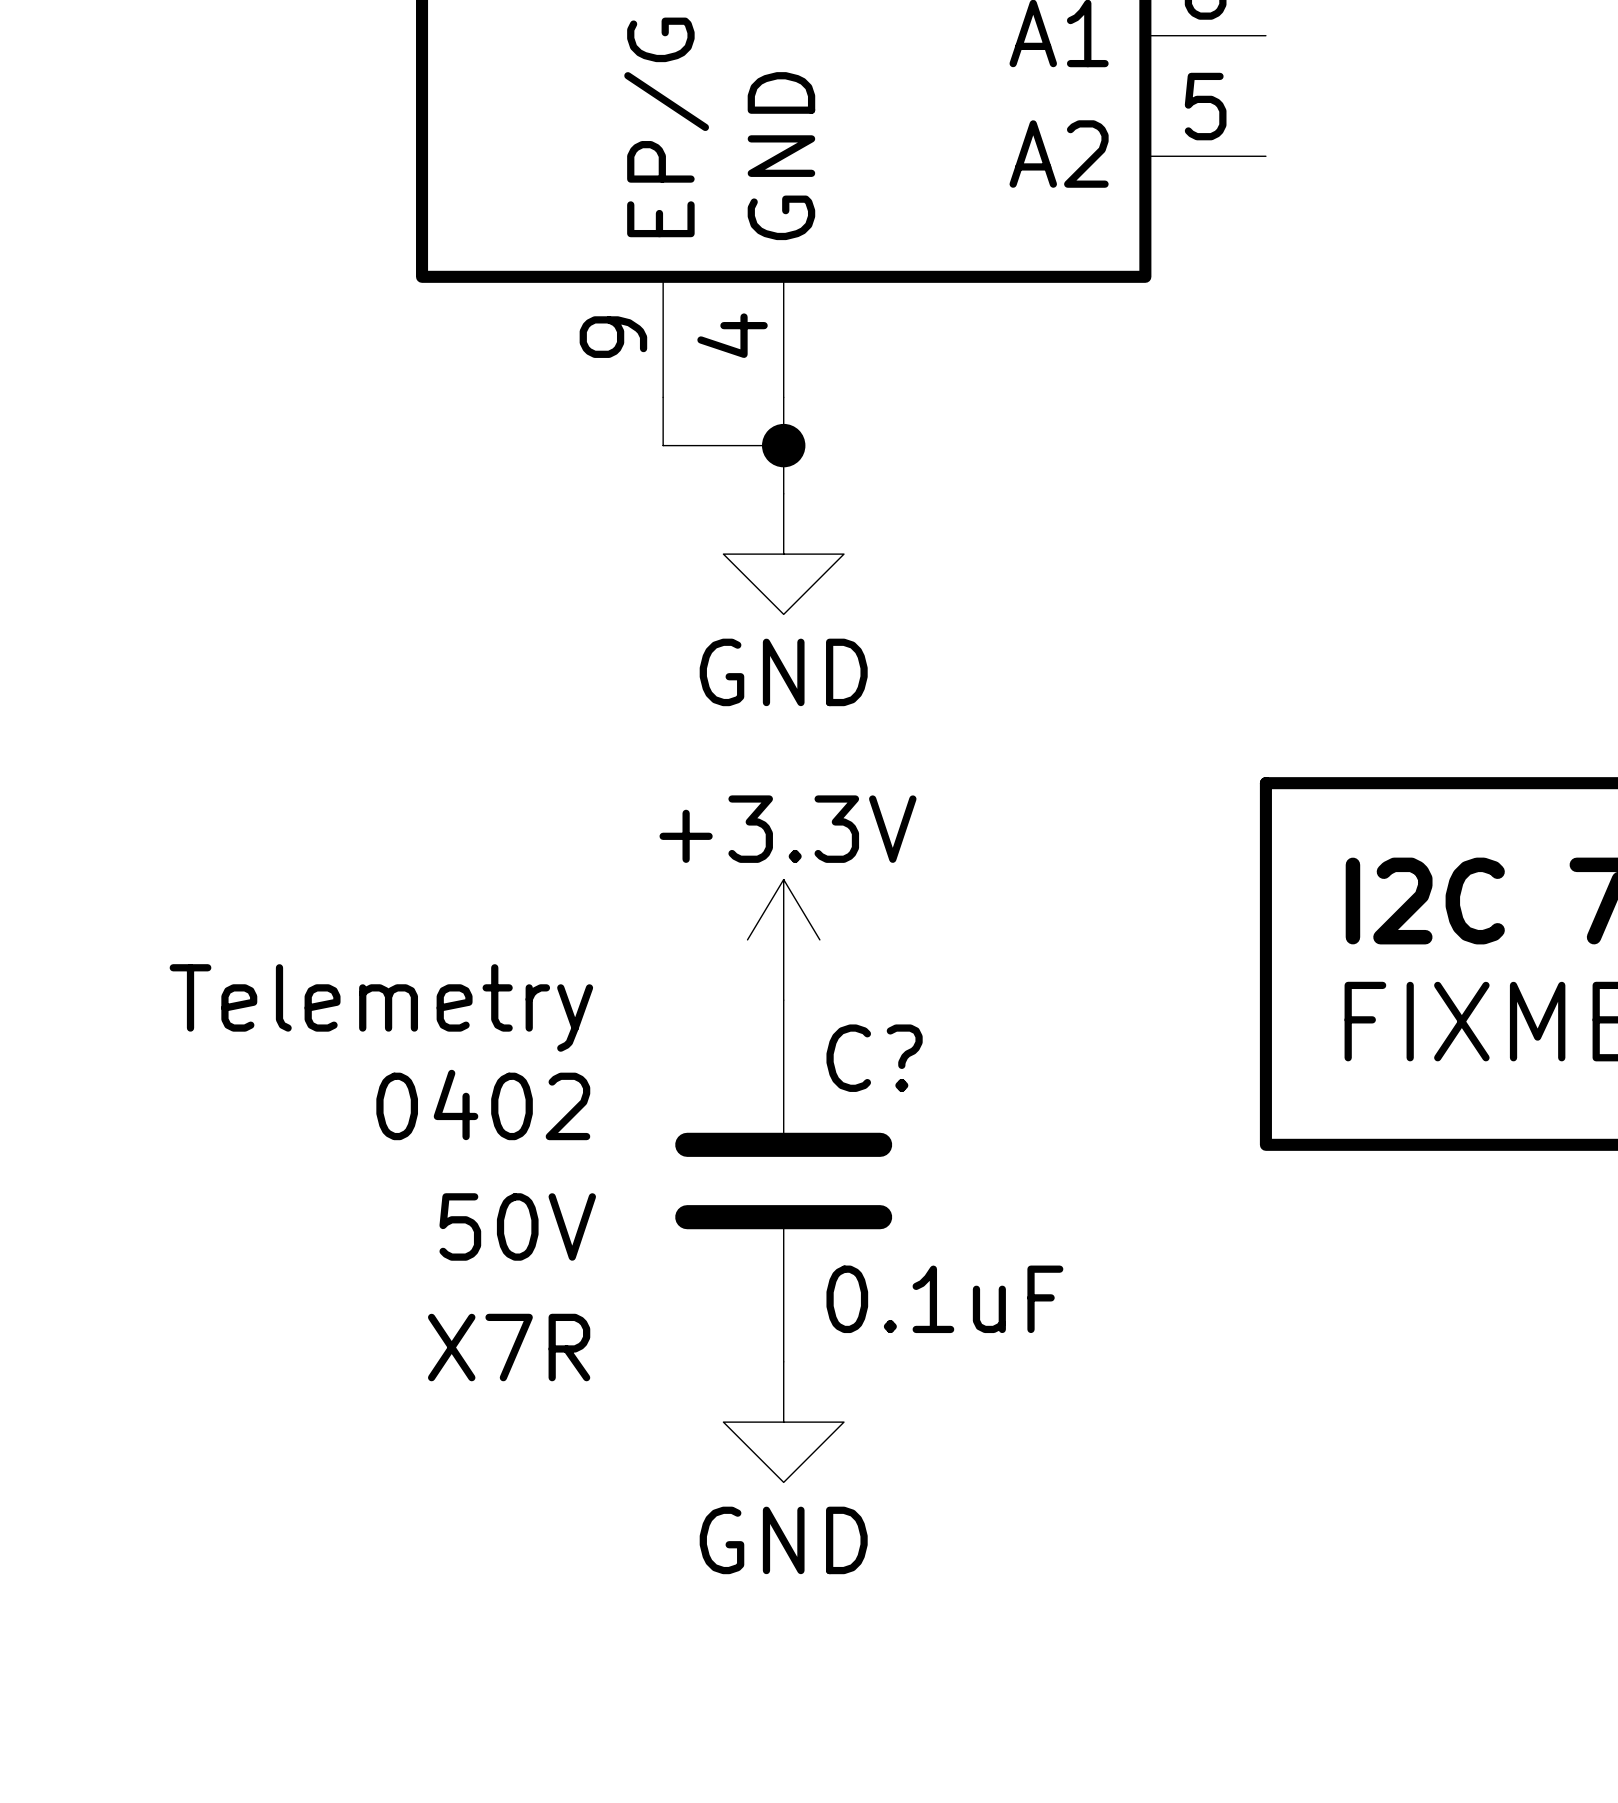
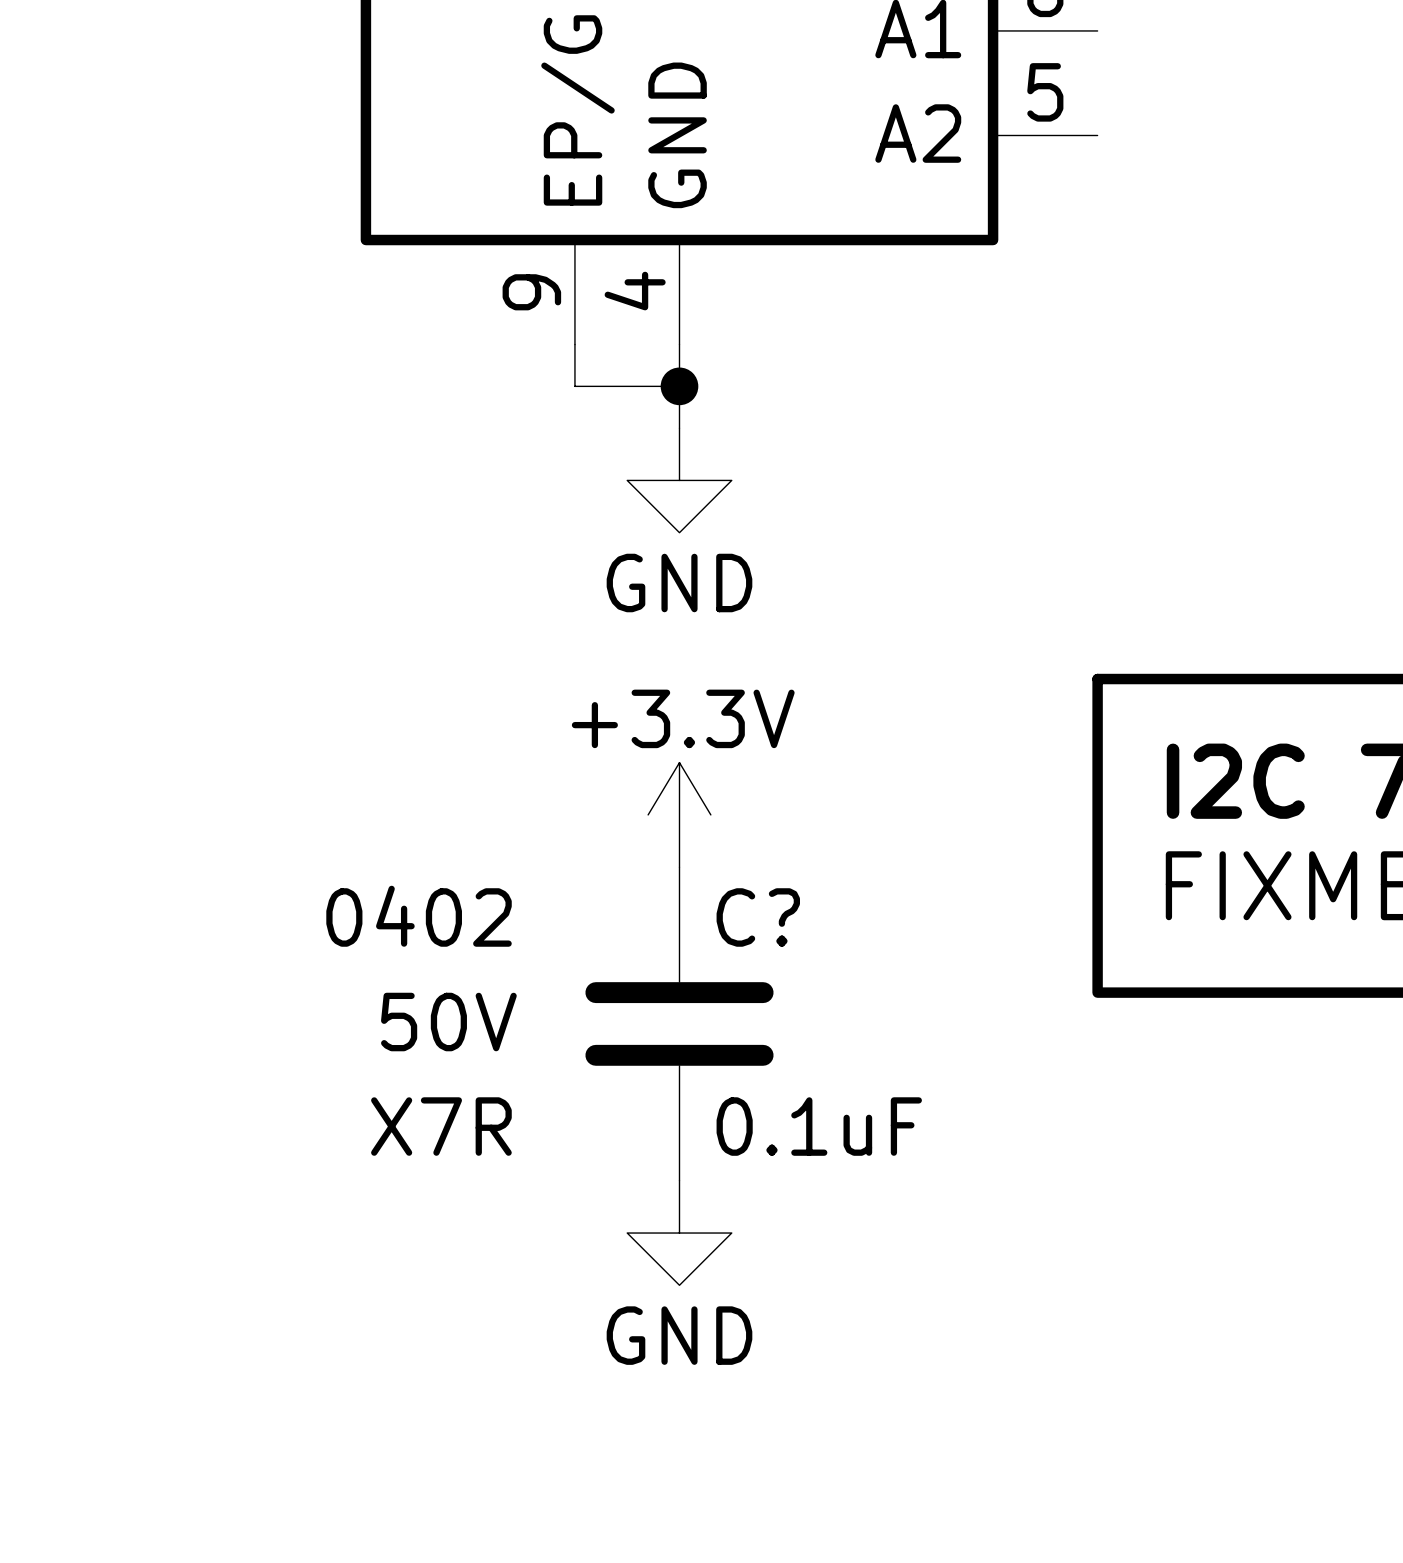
C? text: Telemetry (381, 1007) -> none
C? text position: 0402 (483, 1104) -> 0402 (419, 916)
C? text position: 50V (517, 1226) -> 50V (448, 1022)
C? text position: X7R (509, 1347) -> X7R (441, 1126)

